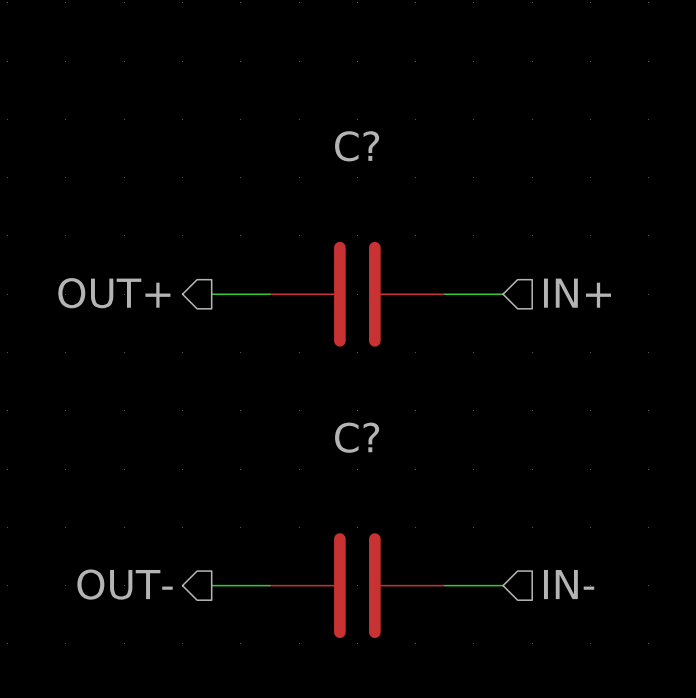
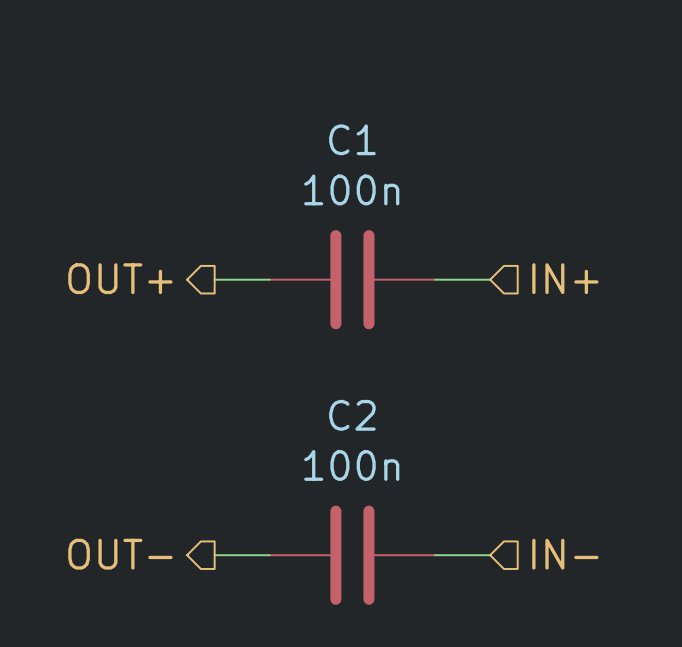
C? name: C? (357, 146) -> C1 (352, 139)
C? value: none -> 100n (351, 189)
C? name: C? (357, 437) -> C2 (352, 415)
C? value: none -> 100n (351, 465)

